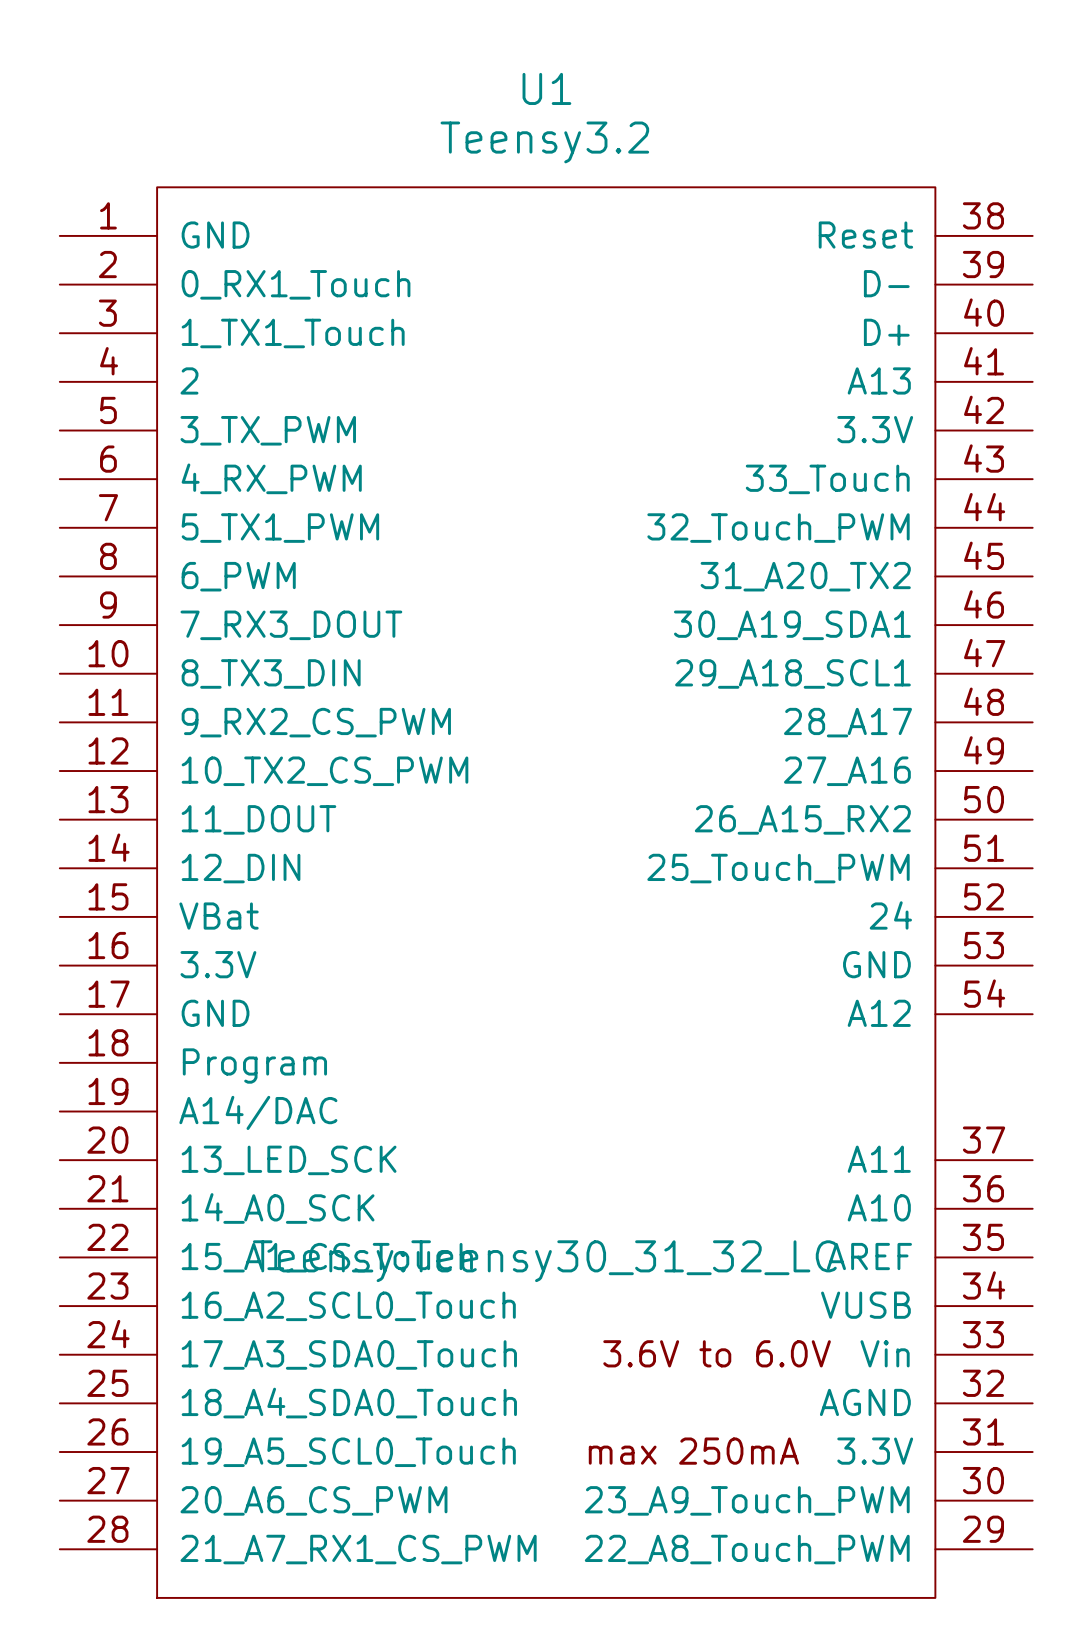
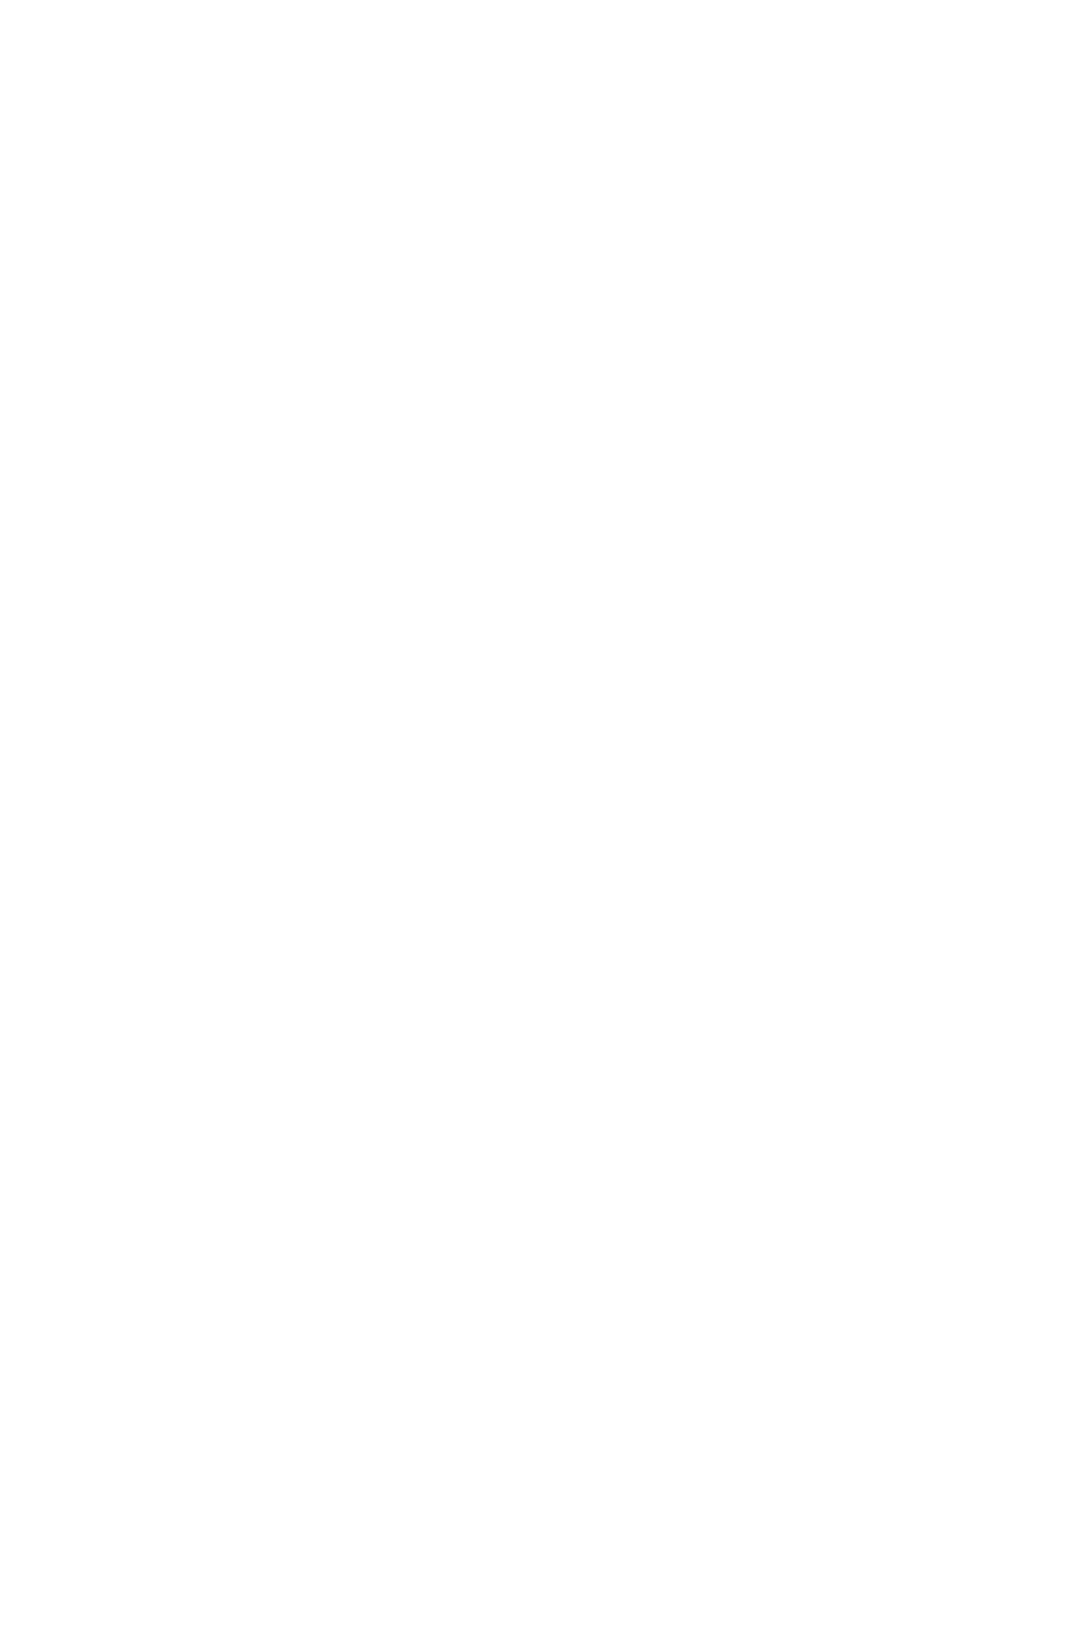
U1: Teensy3.2 (546, 892) -> none

